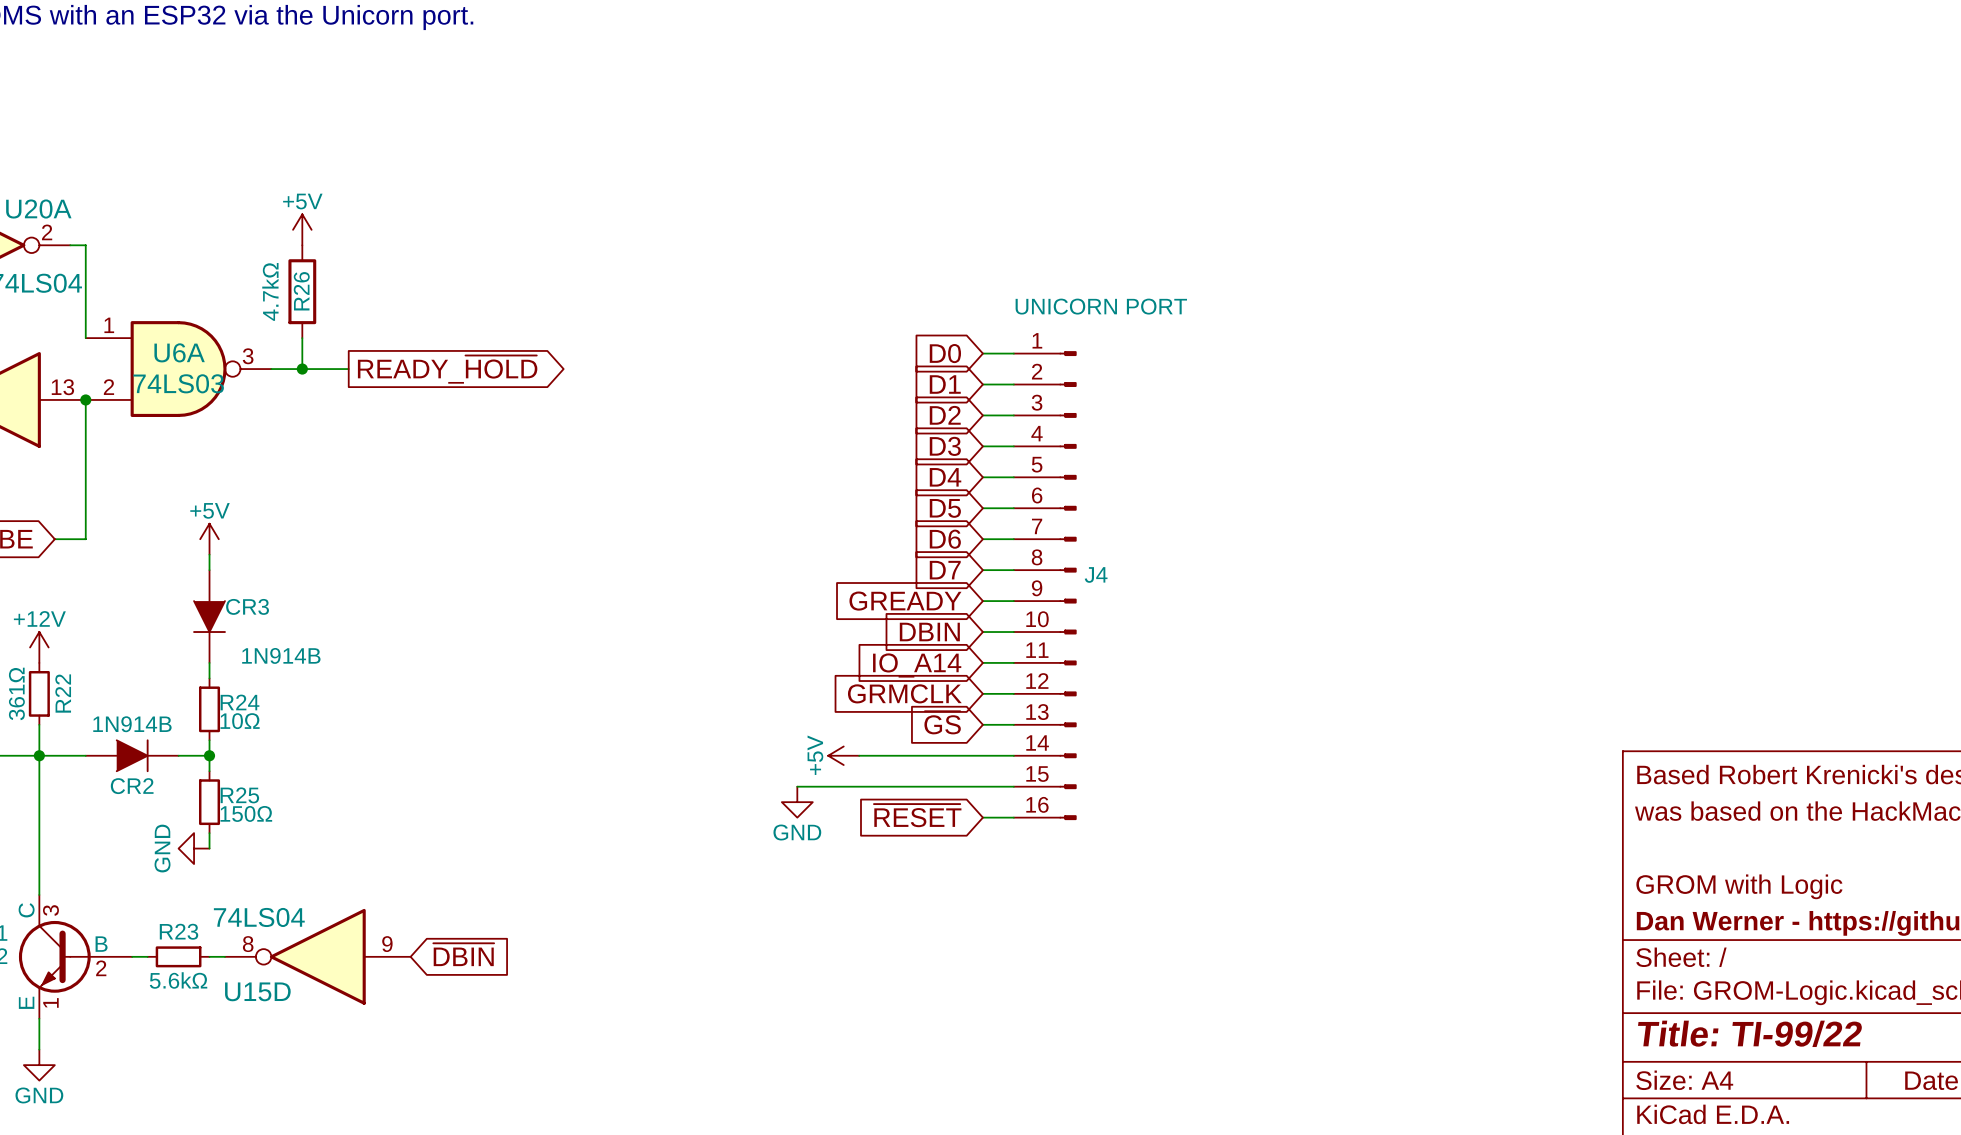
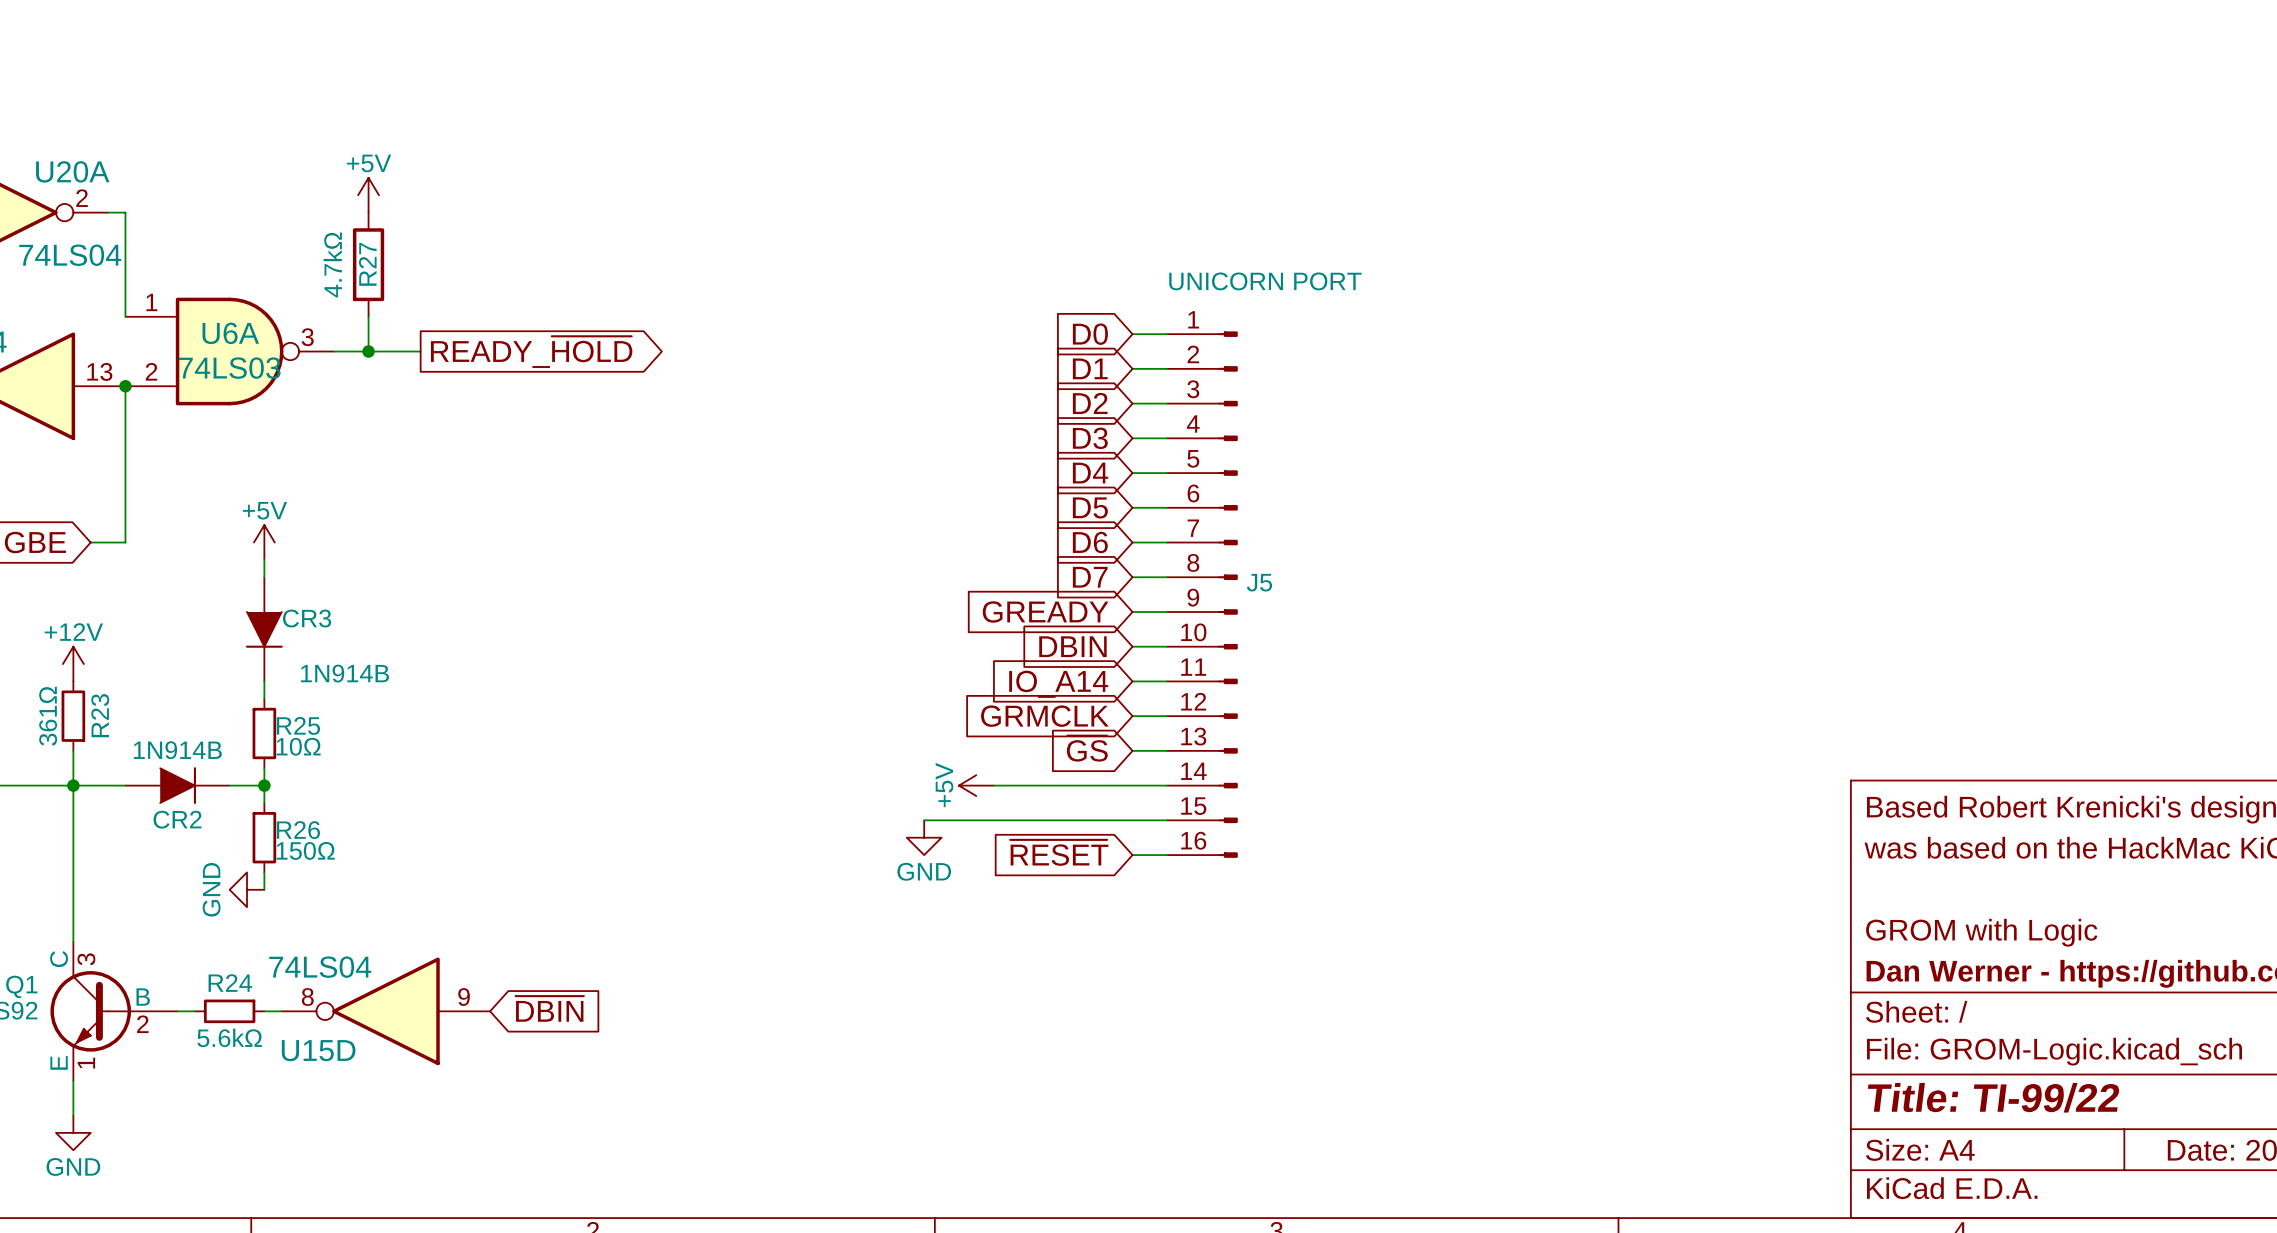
R26 name: R26 (301, 291) -> R27 (367, 264)
J4 name: J4 (1096, 574) -> J5 (1259, 582)
R22 name: R22 (63, 693) -> R23 (100, 715)
R24 name: R24 (240, 702) -> R25 (298, 725)
R25 name: R25 (239, 795) -> R26 (298, 830)
R23 name: R23 (179, 931) -> R24 (230, 983)

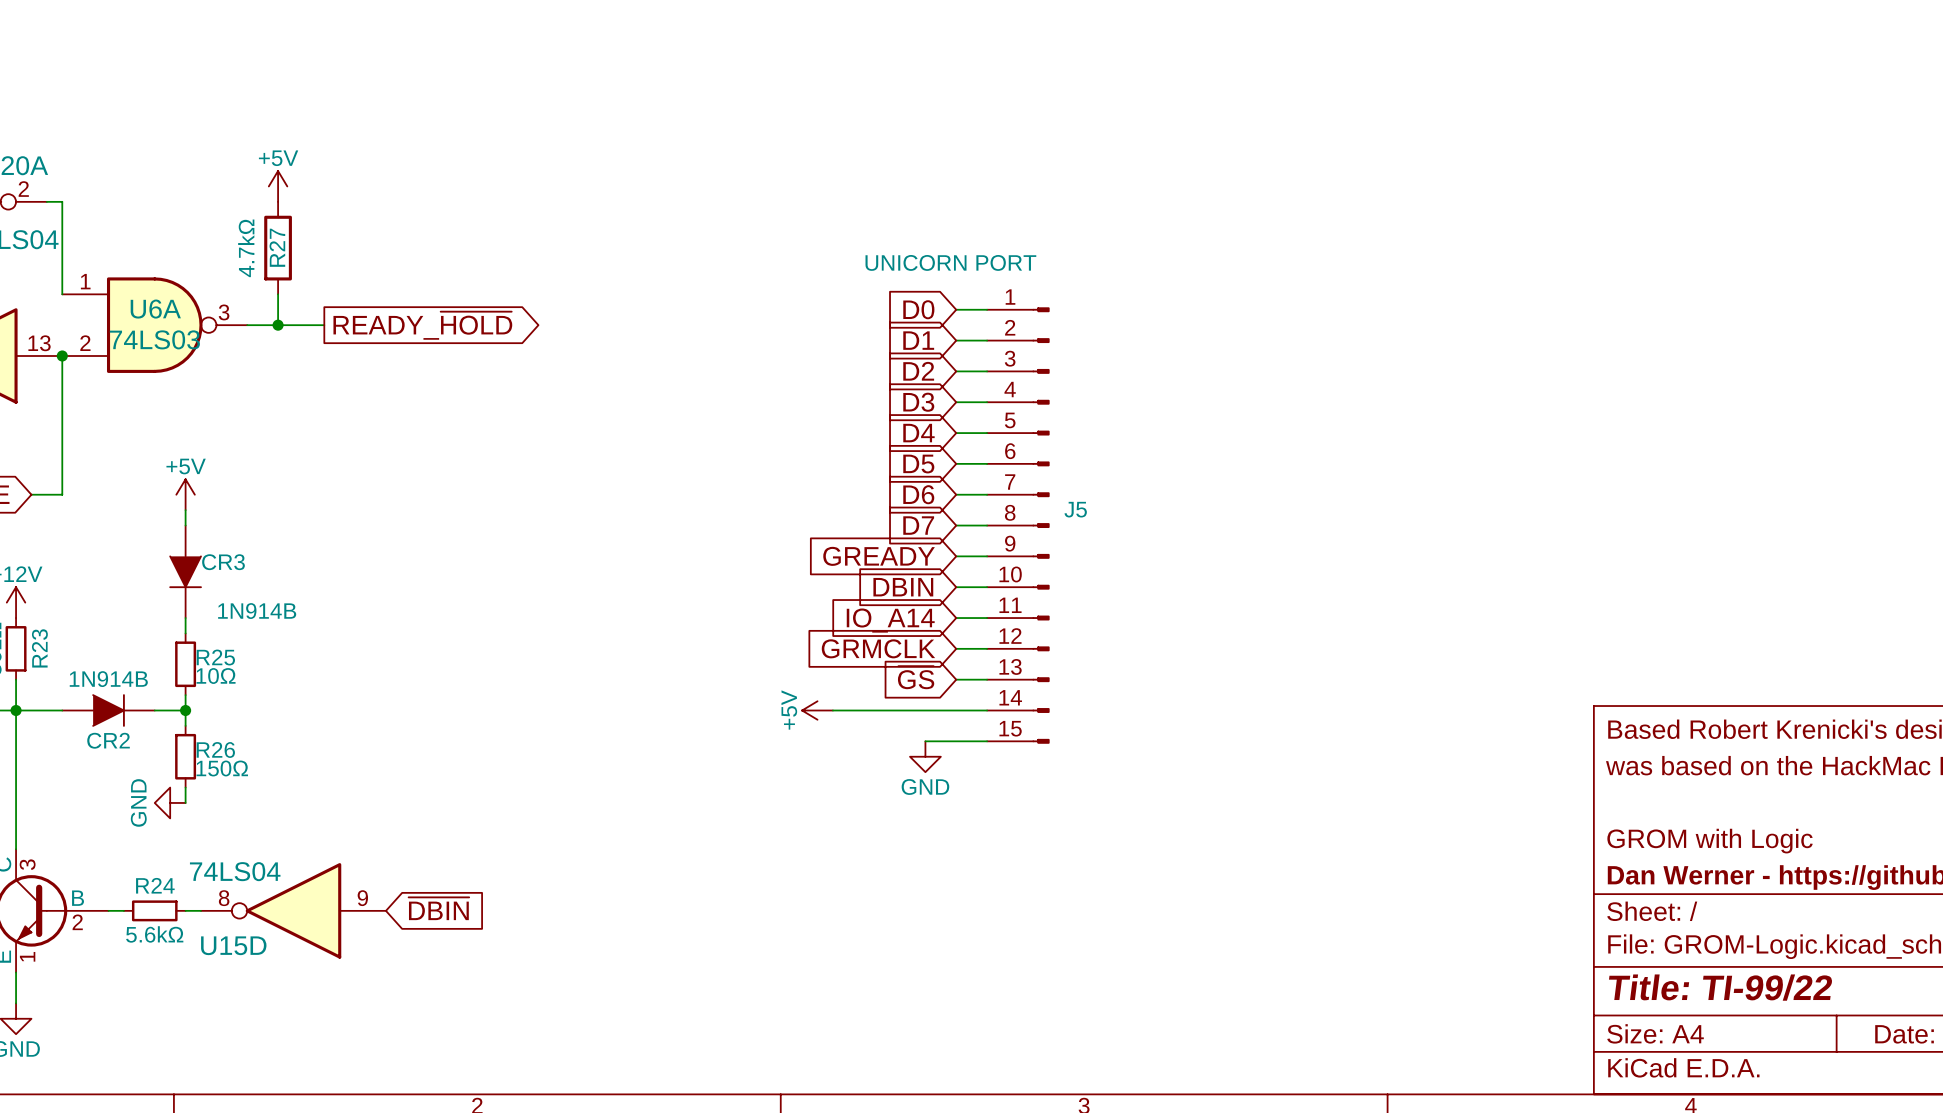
J5 value position: UNICORN PORT (1265, 281) -> UNICORN PORT (950, 262)
J5 symbol: [1167, 331, 1238, 858] -> [987, 307, 1050, 744]
wire: (924, 820) (1097, 820) -> none
power symbol position: GND (924, 837) -> GND (925, 756)
global label: ~{RESET} (1059, 852) -> none
wire: (1132, 855) (1167, 855) -> none

